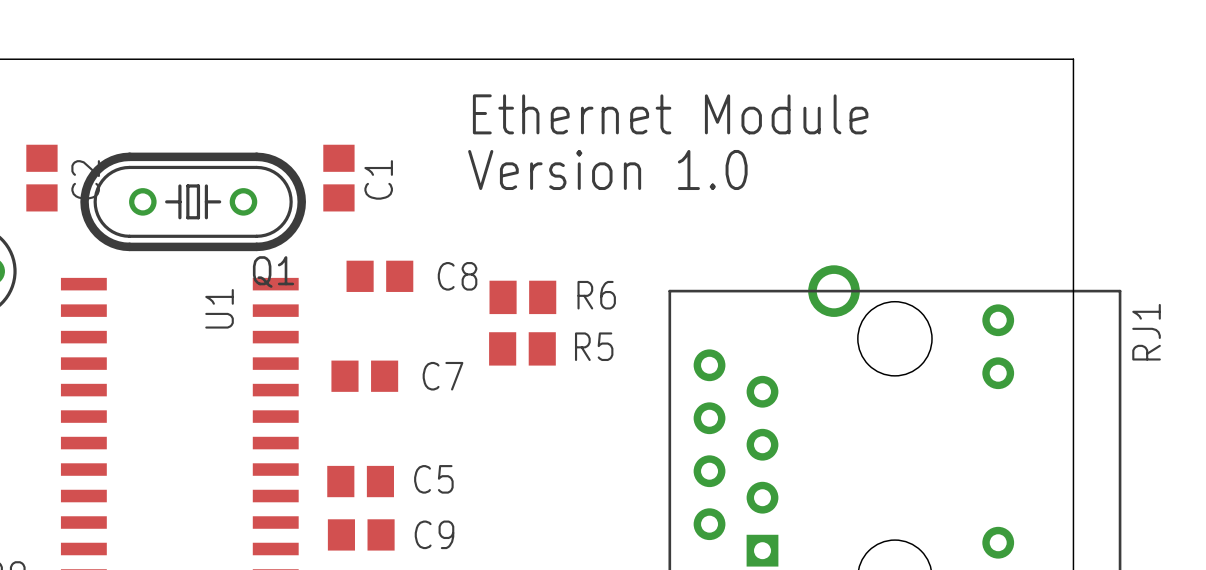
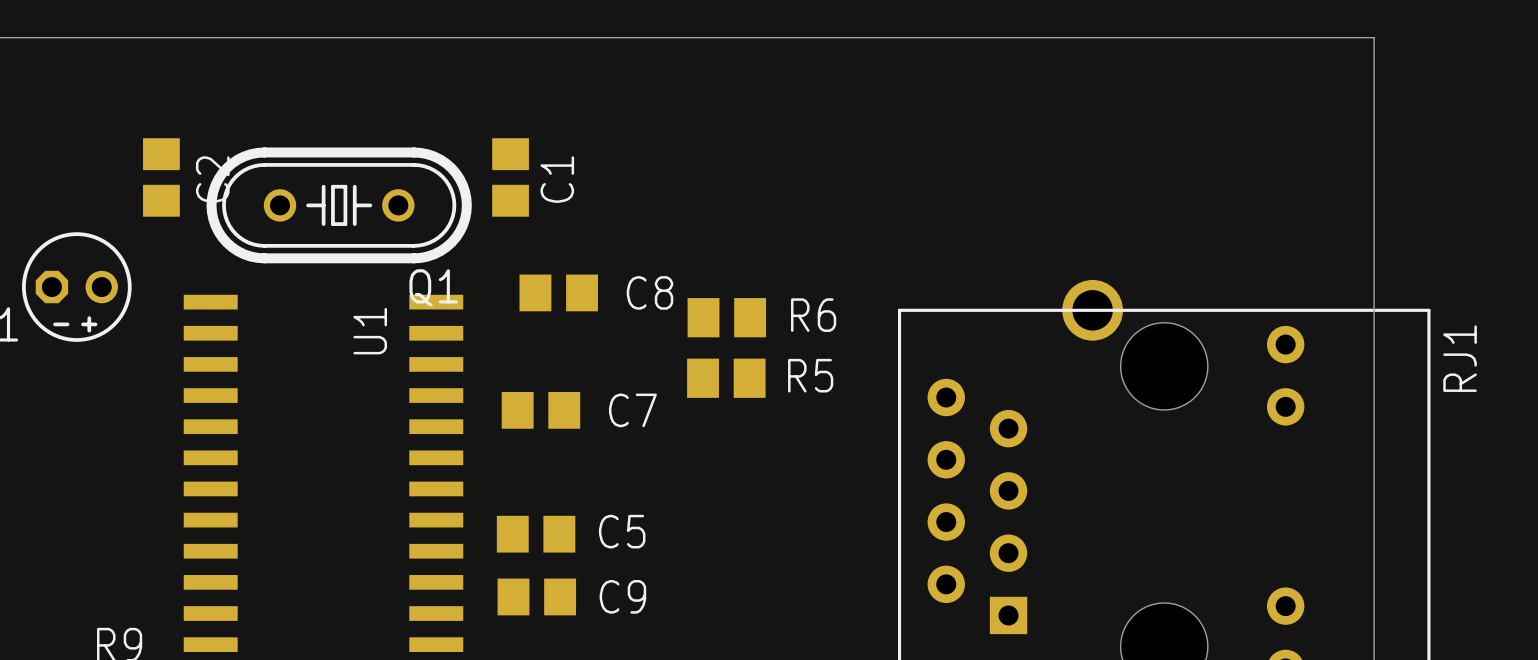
text: Ethernet Module (670, 114) -> none
text: Version 1.0 (607, 169) -> none

